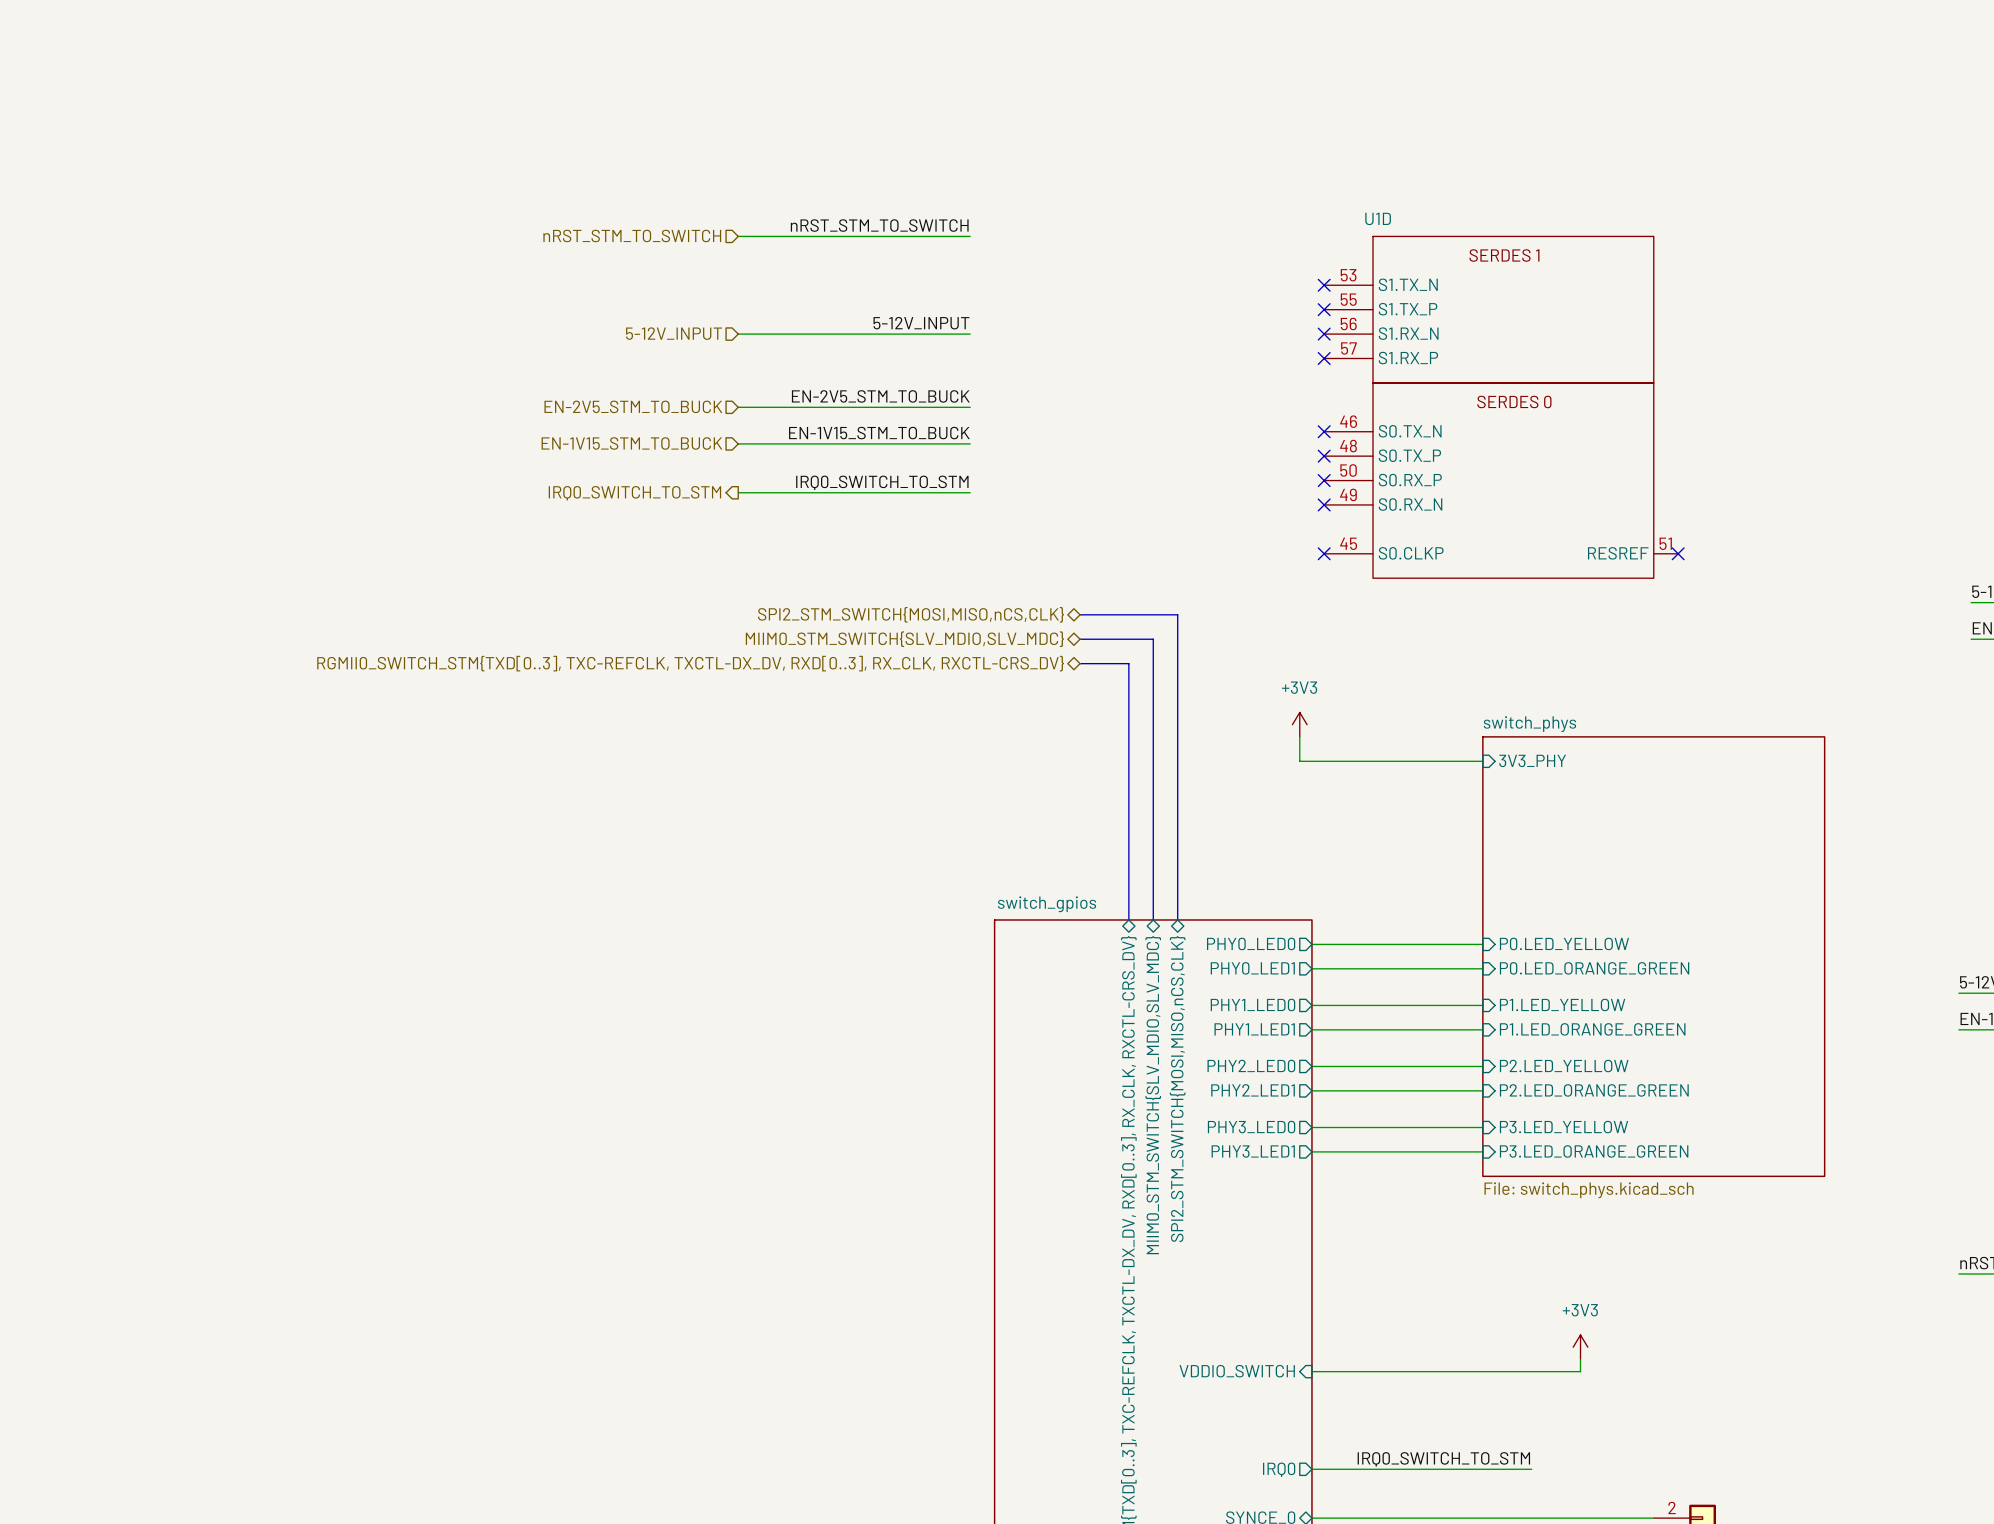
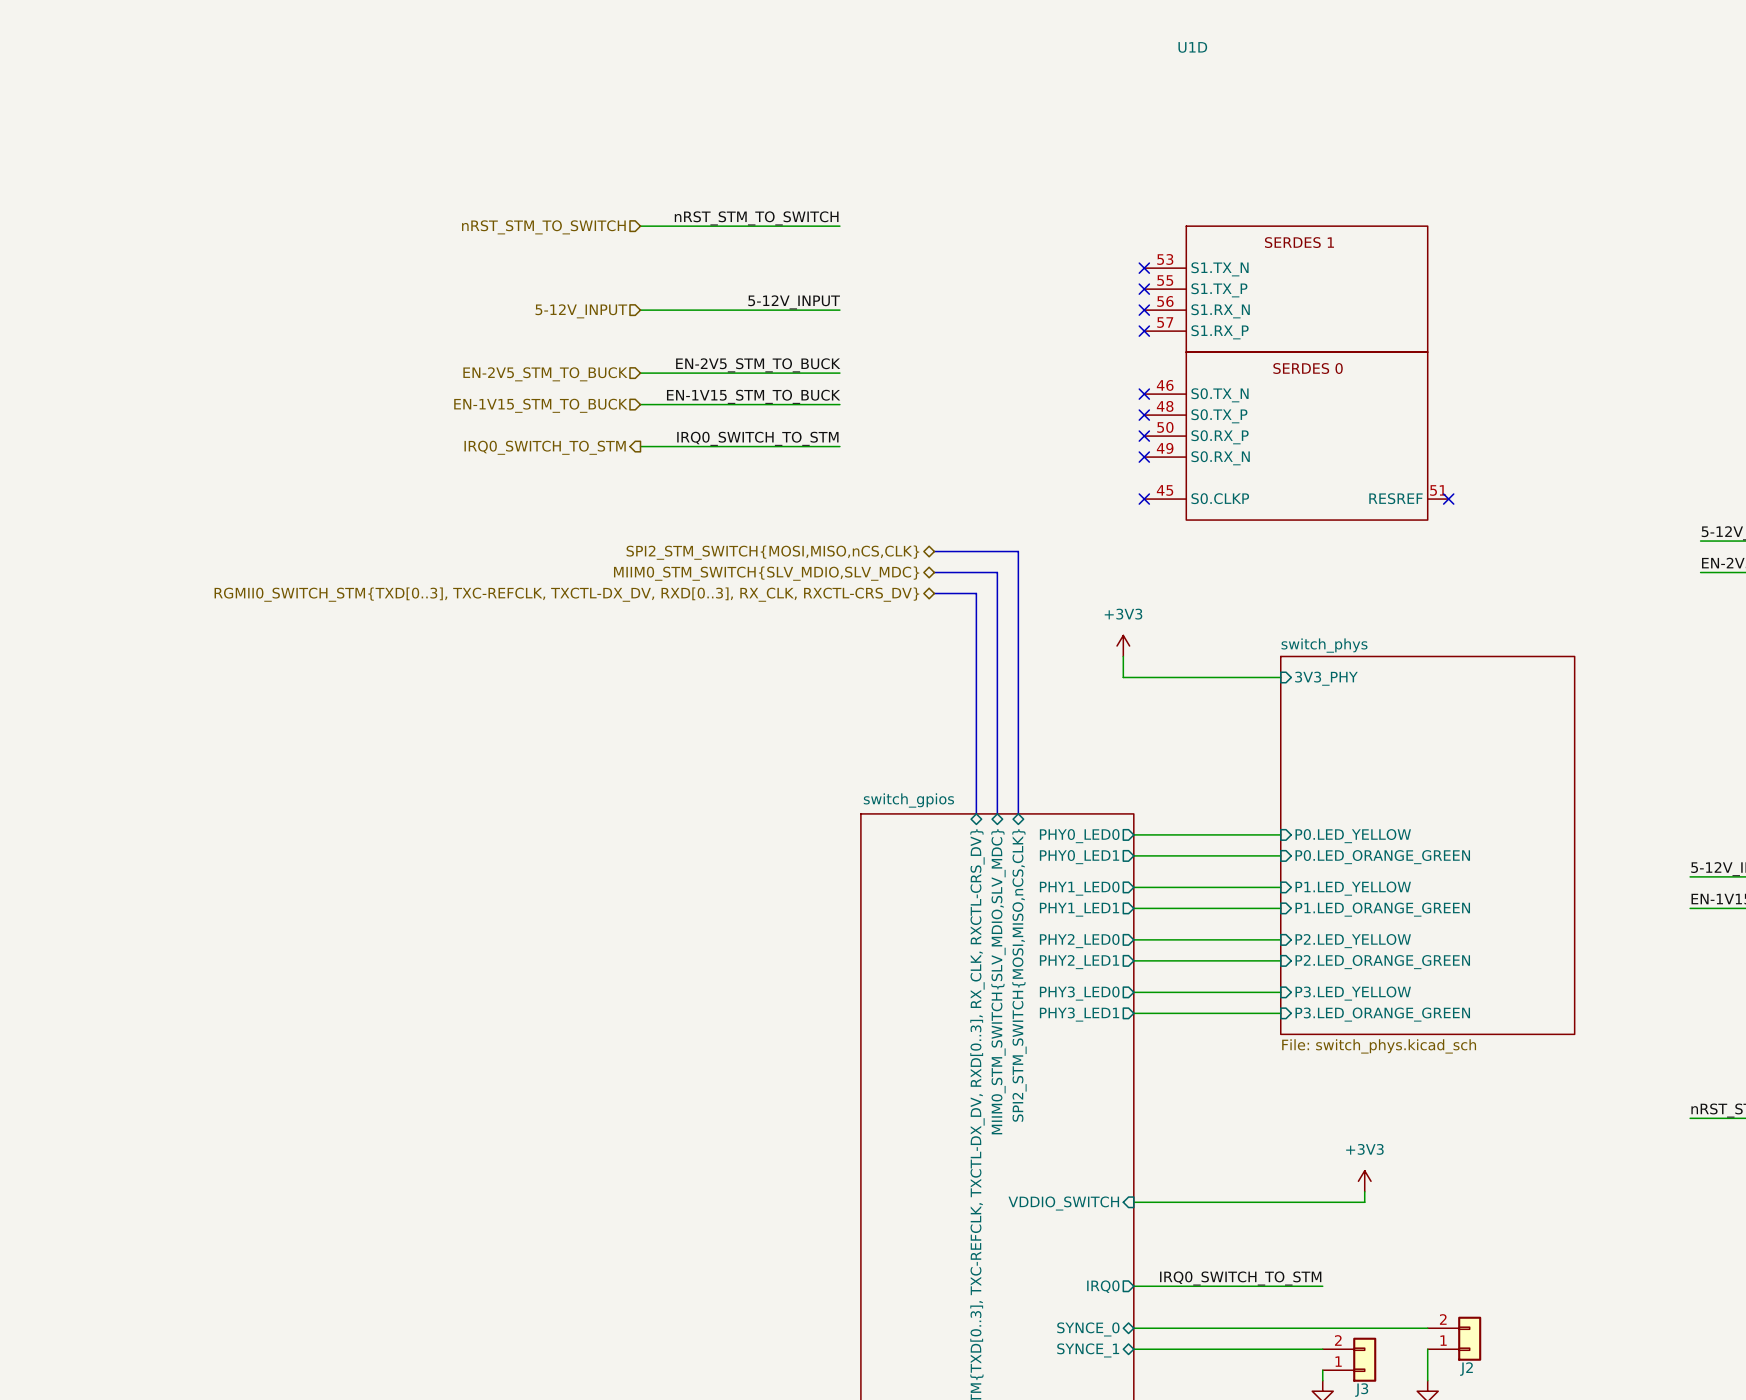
U1D name position: U1D (1378, 218) -> U1D (1192, 47)

